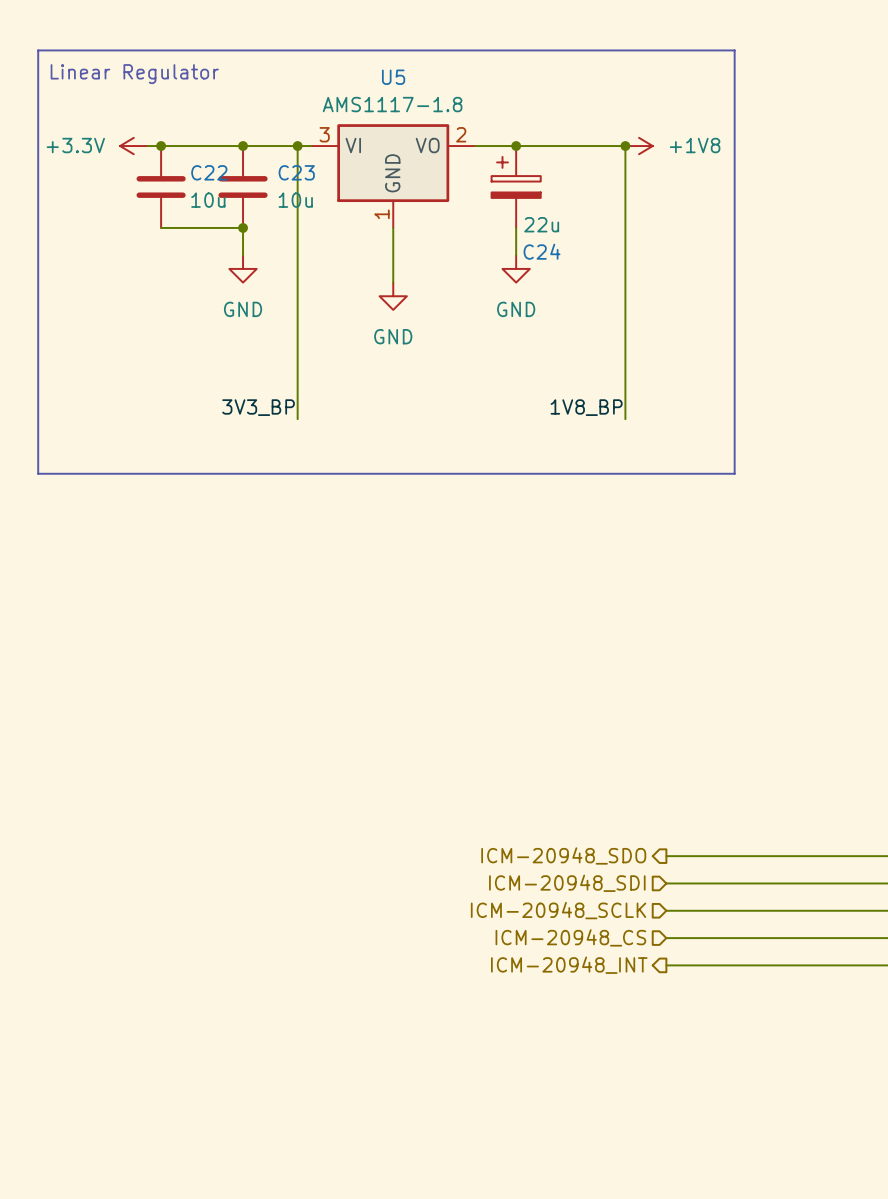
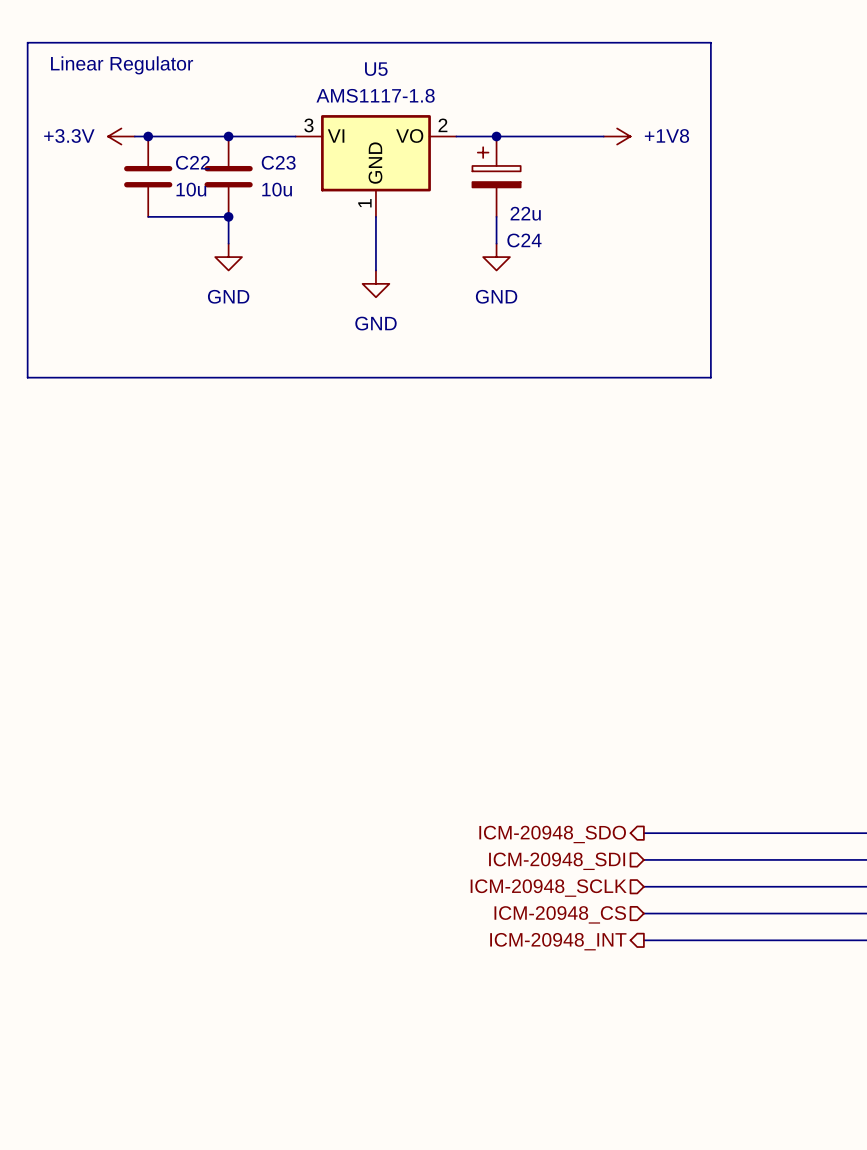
wire: (297, 146) (297, 419) -> none
junction: (297, 146) -> none
wire: (625, 146) (625, 419) -> none
junction: (625, 146) -> none
line: (38, 391) (38, 473) (734, 473) (734, 391) -> (27, 377) (710, 377)
label: 3V3_BP (258, 407) -> none
label: 1V8_BP (586, 407) -> none

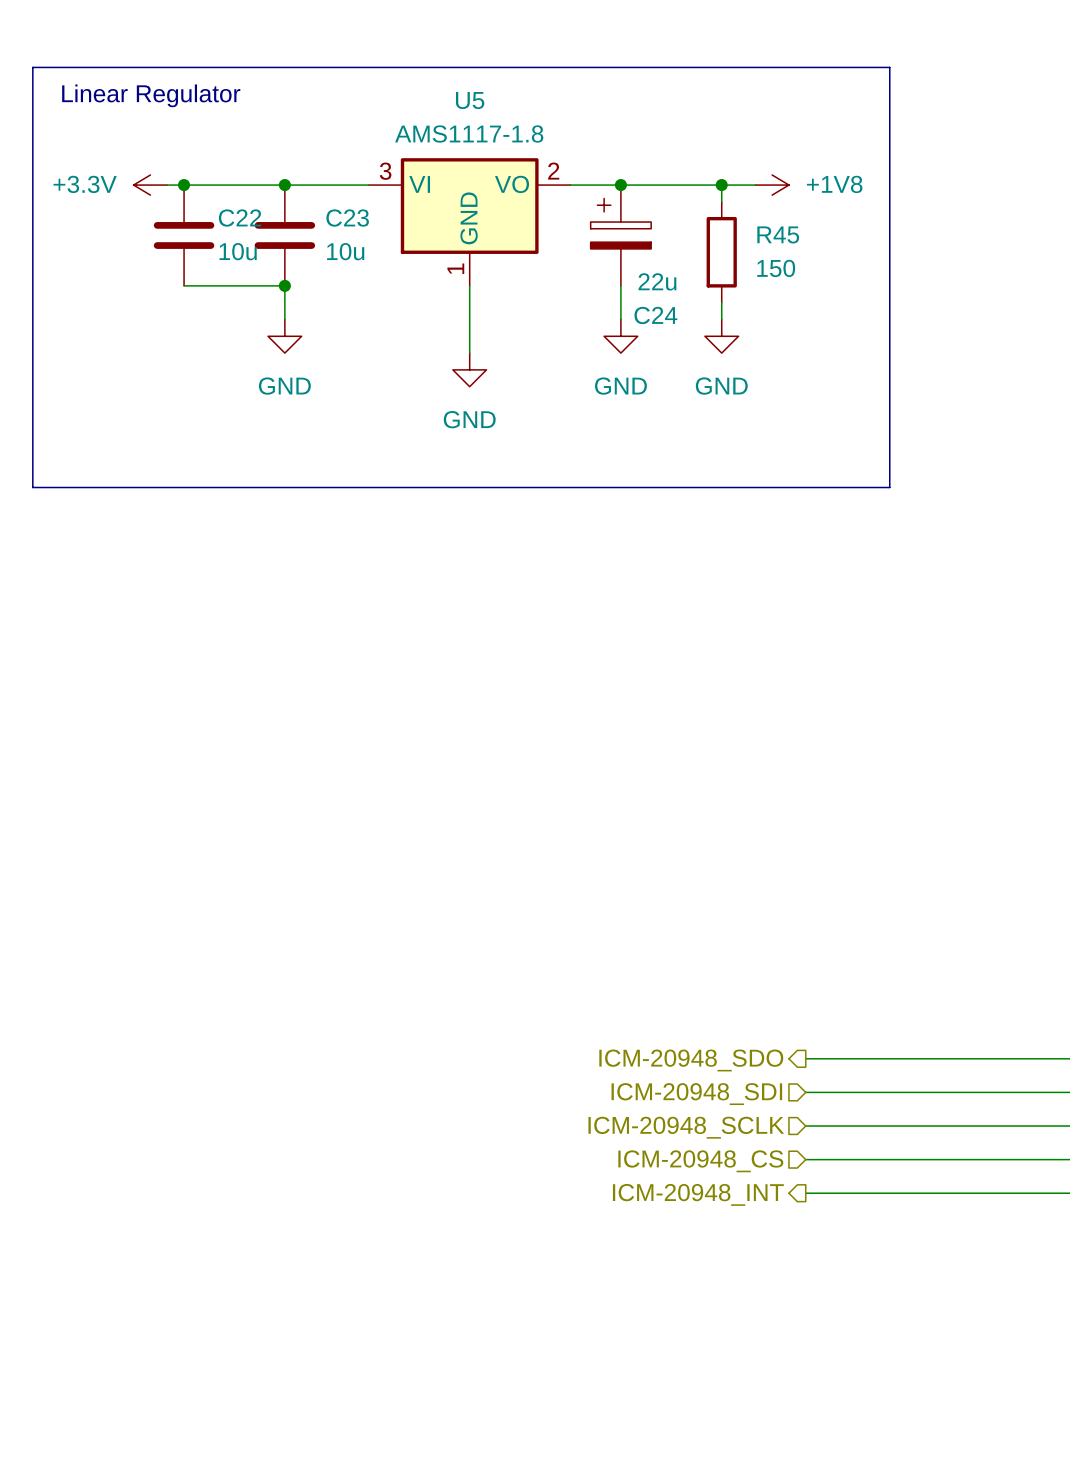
wire: none -> (721, 185) (721, 201)
junction: none -> (721, 185)
R45: none -> 150 (721, 252)
wire: none -> (721, 302) (721, 319)
power symbol: none -> GND (721, 336)

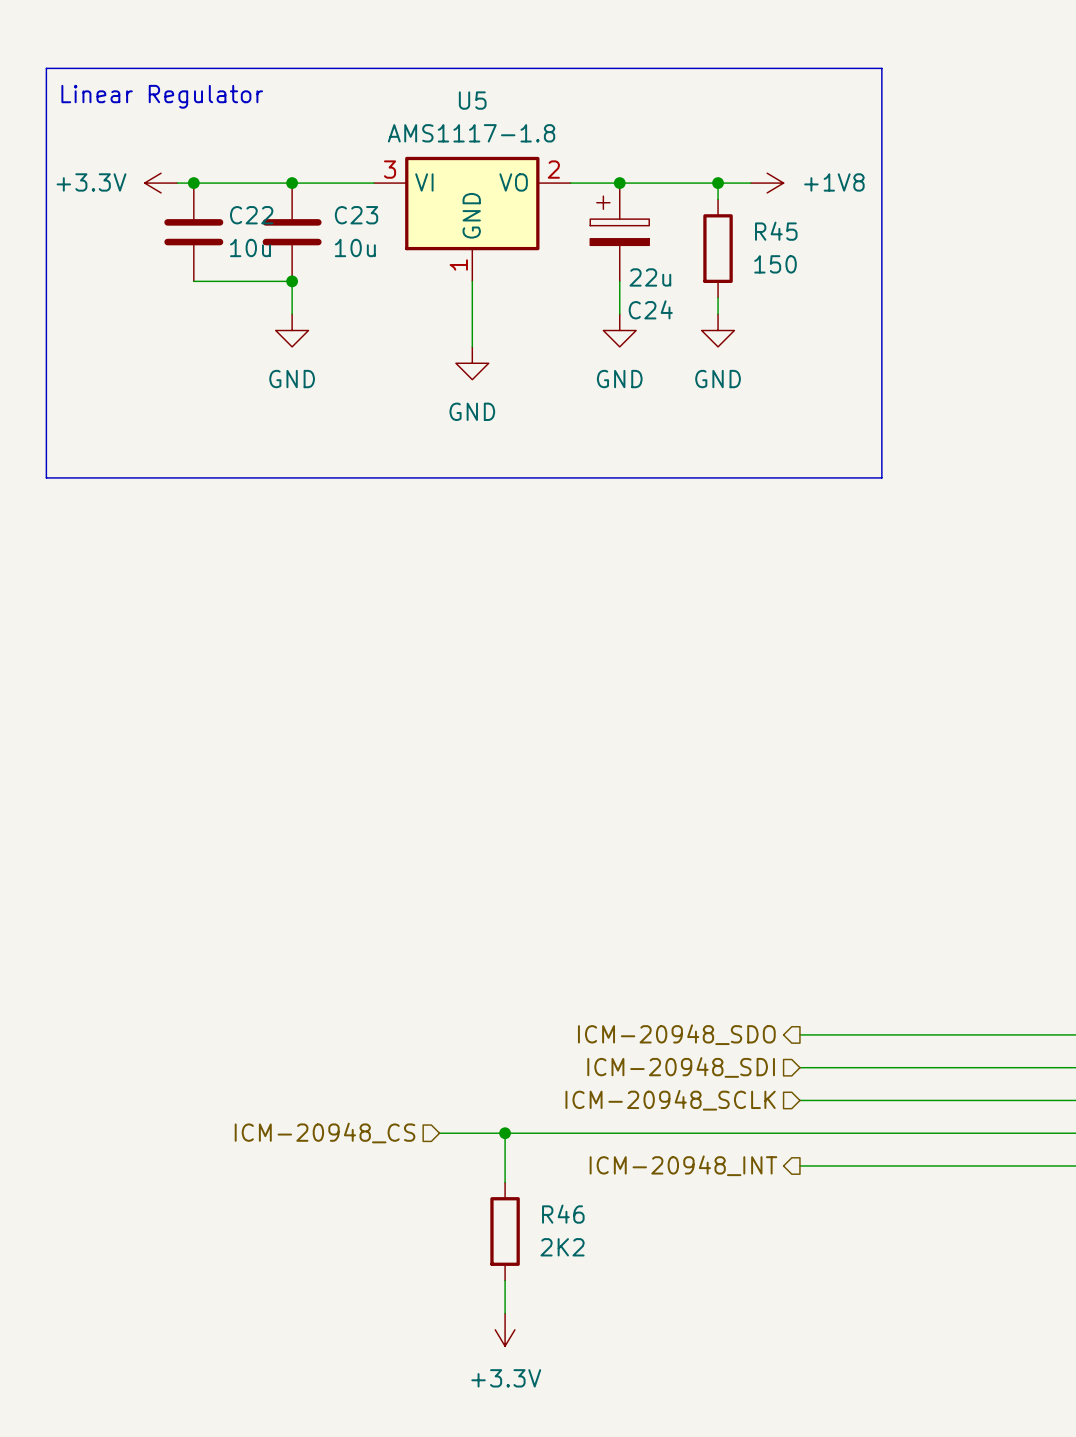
wire: none -> (439, 1133) (799, 1133)
wire: none -> (505, 1133) (505, 1182)
junction: none -> (505, 1133)
hierarchical label: none -> ICM-20948_CS (325, 1133)
hierarchical label: ICM-20948_CS (700, 1161) -> none
R46: none -> 2K2 (505, 1231)
wire: none -> (505, 1280) (505, 1313)
power symbol: none -> +3.3V (505, 1329)

